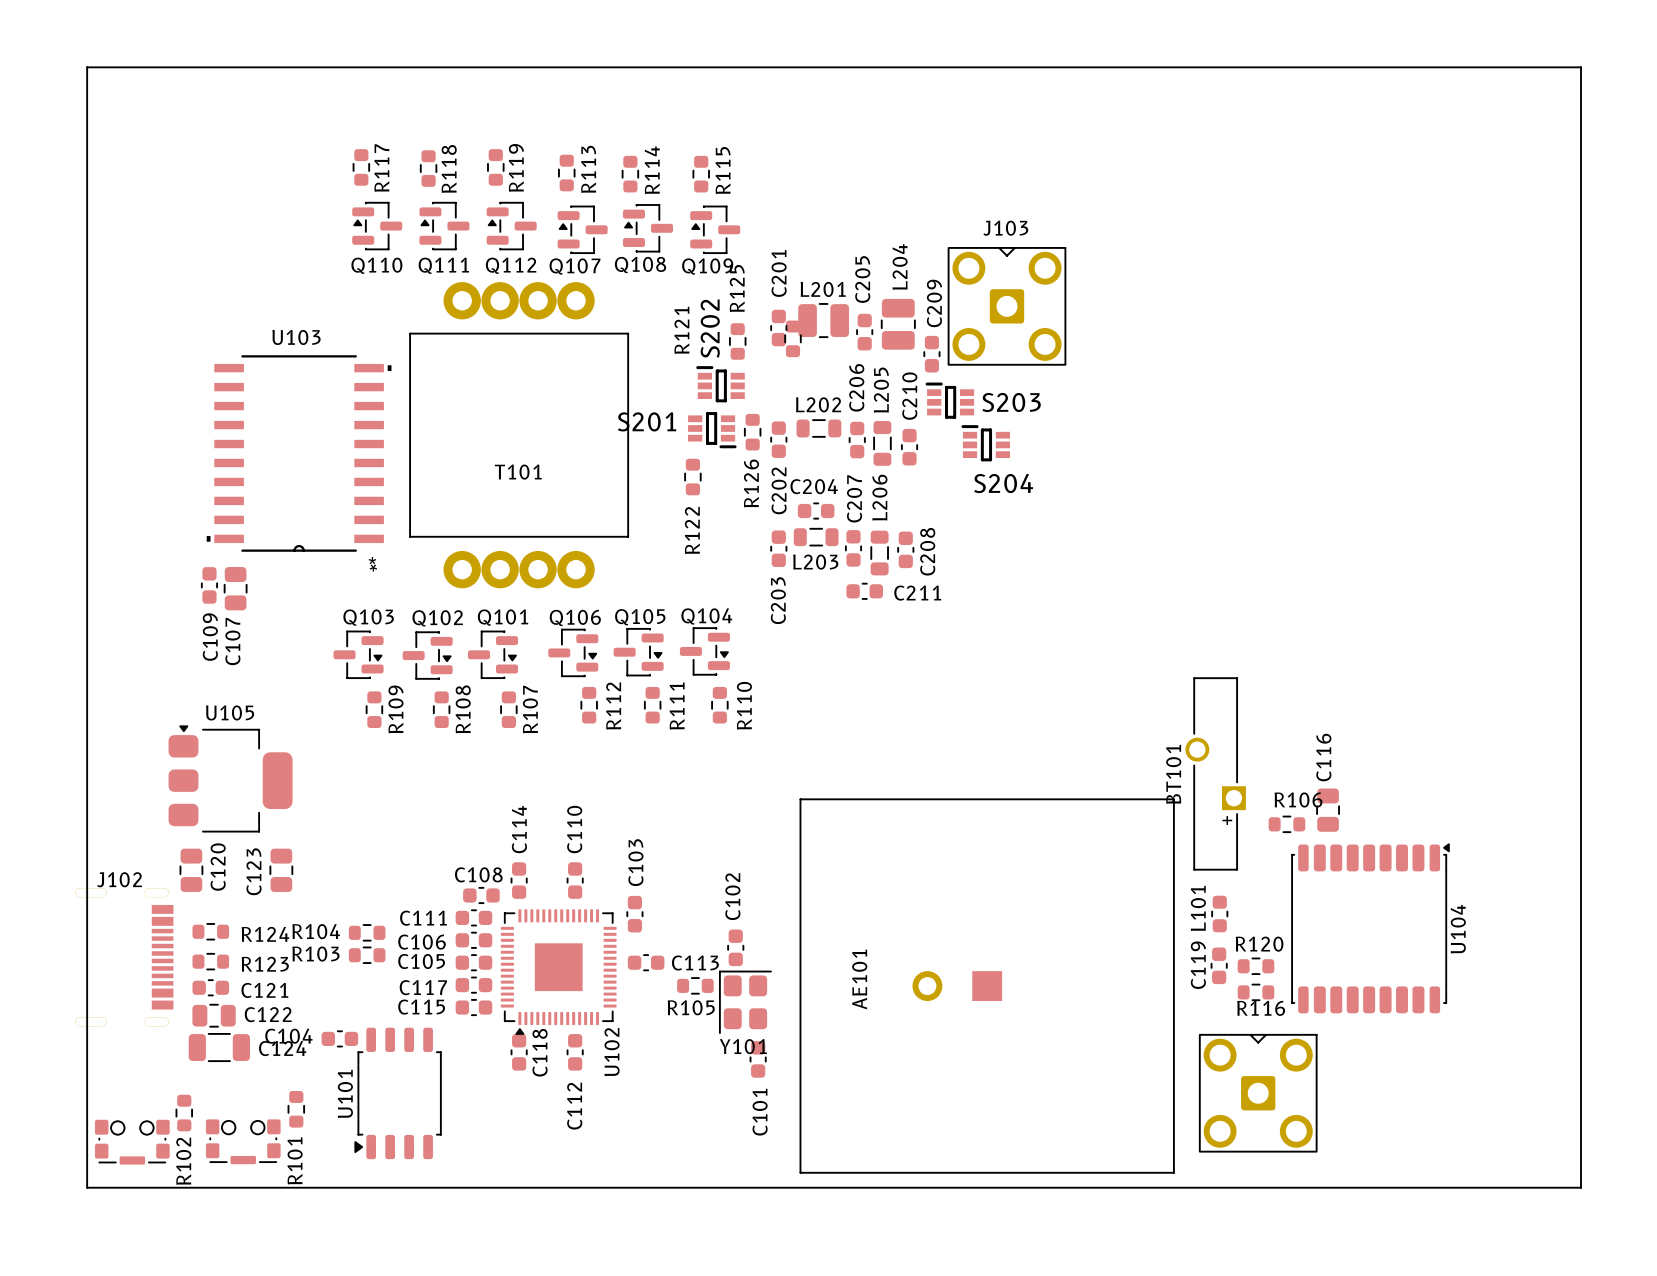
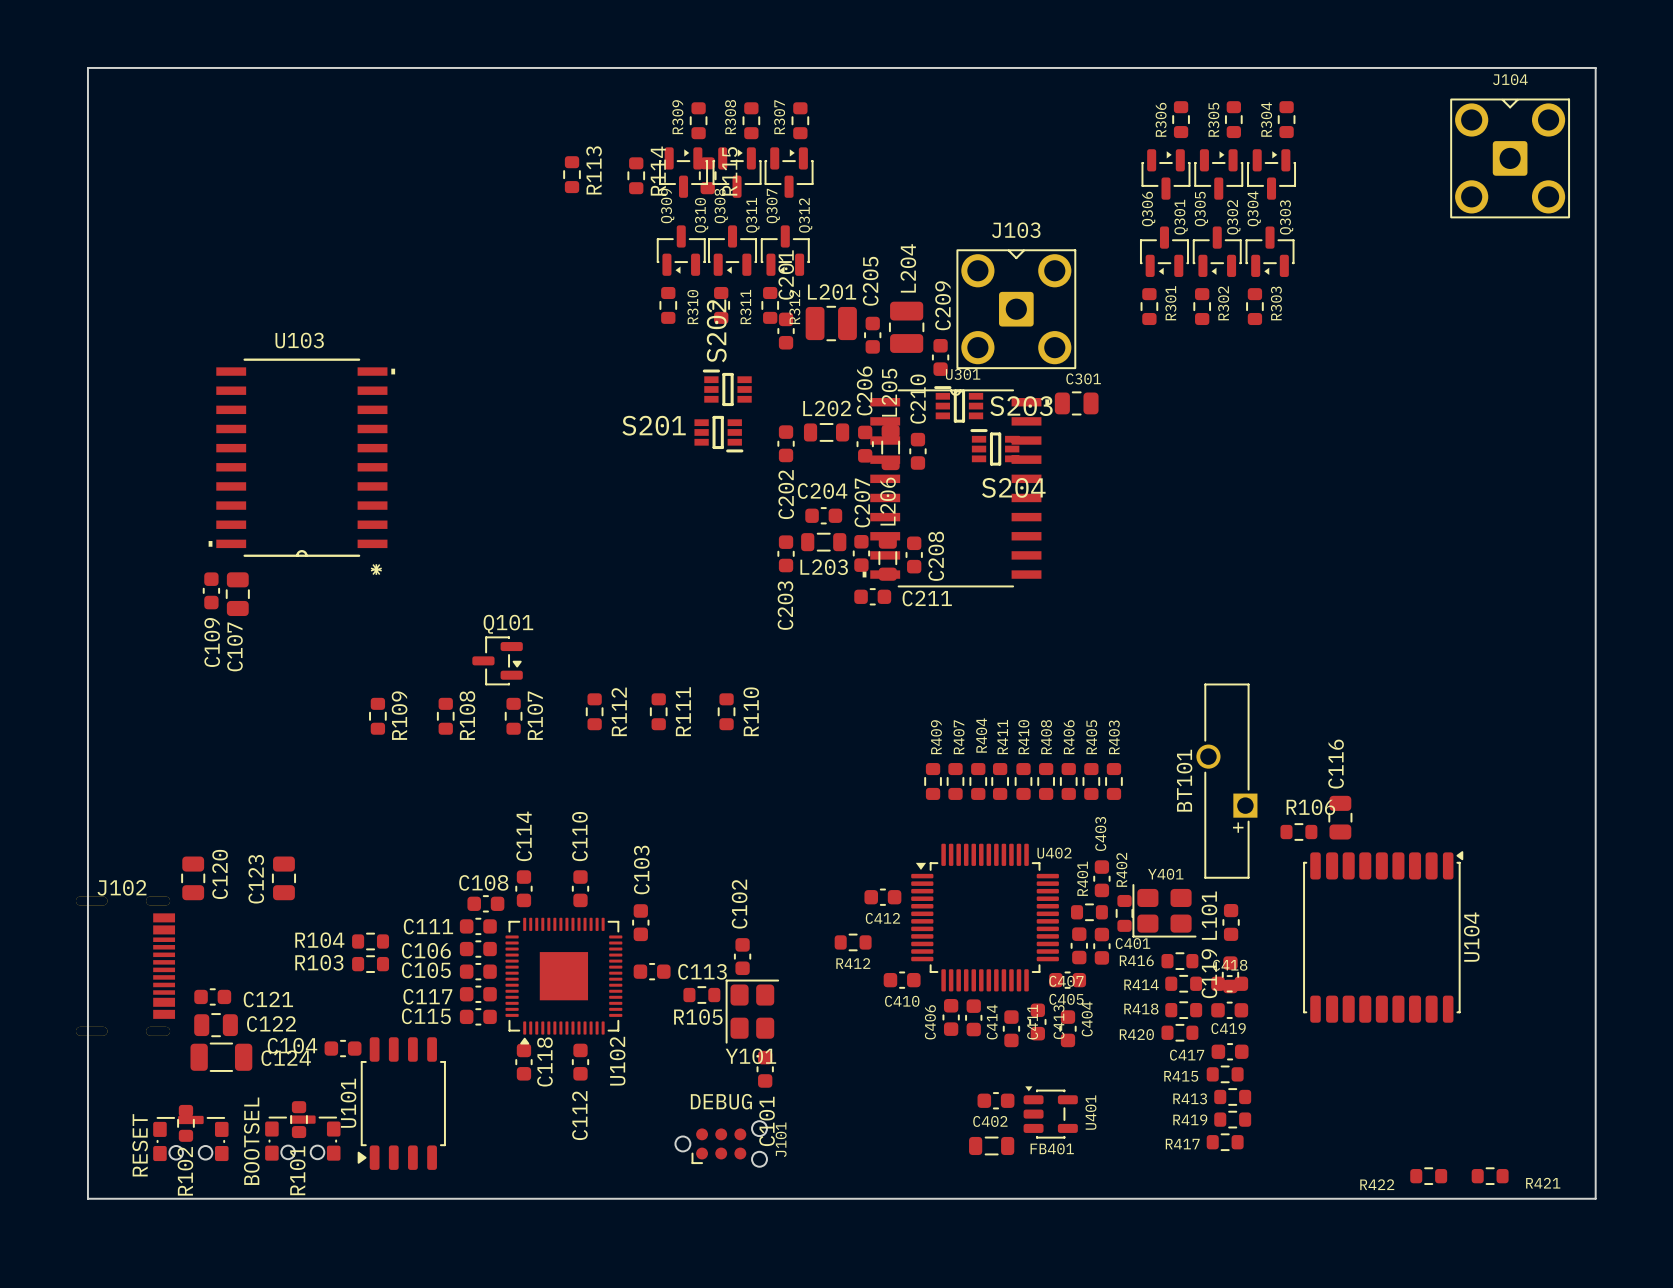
R306: none -> (1181, 119)
R305: none -> (1233, 119)
R304: none -> (1286, 119)
R309: none -> (698, 120)
R308: none -> (751, 120)
R307: none -> (800, 120)
J104: none -> (1510, 158)
R117: (361, 167) -> none
R119: (495, 167) -> none
R118: (428, 168) -> none
Q309: none -> (683, 172)
Q308: none -> (737, 172)
Q307: none -> (789, 172)
Q306: none -> (1165, 174)
Q305: none -> (1218, 174)
Q304: none -> (1271, 174)
Q110: (377, 226) -> none
Q111: (444, 226) -> none
Q112: (511, 226) -> none
Q108: (647, 228) -> none
Q107: (582, 229) -> none
Q109: (715, 229) -> none
Q310: none -> (681, 250)
Q311: none -> (732, 250)
Q312: none -> (785, 250)
Q301: none -> (1164, 251)
Q302: none -> (1217, 251)
Q303: none -> (1270, 251)
R310: none -> (668, 305)
R311: none -> (721, 305)
R312: none -> (770, 305)
R301: none -> (1149, 306)
R302: none -> (1202, 306)
R303: none -> (1254, 306)
R121: (793, 338) -> none
R125: (737, 341) -> none
C301: none -> (1076, 403)
R126: (752, 432) -> none
T101: (519, 435) -> none
R122: (692, 477) -> none
U301: none -> (955, 488)
Q104: (704, 651) -> none
Q106: (573, 652) -> none
Q105: (638, 652) -> none
Q103: (358, 654) -> none
Q102: (427, 655) -> none
R409: none -> (933, 781)
R407: none -> (955, 781)
R404: none -> (978, 781)
R411: none -> (1000, 781)
R410: none -> (1023, 781)
R408: none -> (1046, 781)
R406: none -> (1068, 781)
R405: none -> (1091, 781)
R403: none -> (1113, 781)
U105: (230, 778) -> none
C403: none -> (1101, 878)
C412: none -> (882, 897)
Y401: none -> (1164, 910)
R401: none -> (1089, 912)
R402: none -> (1124, 913)
U402: none -> (985, 917)
R124: (210, 931) -> none
R412: none -> (853, 942)
C407: none -> (1079, 945)
C401: none -> (1101, 946)
R416: none -> (1179, 961)
R123: (210, 961) -> none
R120: (1255, 966) -> none
C410: none -> (902, 980)
C405: none -> (1067, 980)
R414: none -> (1183, 983)
C418: none -> (1229, 983)
AE101: (987, 986) -> none
R116: (1255, 992) -> none
R420: none -> (1183, 1010)
C419: none -> (1229, 1010)
C406: none -> (951, 1017)
C414: none -> (973, 1017)
C413: none -> (1037, 1021)
C411: none -> (1011, 1028)
C404: none -> (1067, 1028)
R418: none -> (1179, 1032)
C417: none -> (1230, 1051)
R415: none -> (1225, 1074)
R413: none -> (1232, 1096)
C402: none -> (995, 1100)
part: (1258, 1093) -> none
U401: none -> (1050, 1111)
R419: none -> (1232, 1119)
part: none -> (190, 1138)
part: none -> (302, 1138)
R417: none -> (1225, 1142)
J101: none -> (721, 1143)
FB401: none -> (991, 1145)
part: (243, 1141) -> none
part: (132, 1142) -> none
R422: none -> (1428, 1176)
R421: none -> (1490, 1176)

